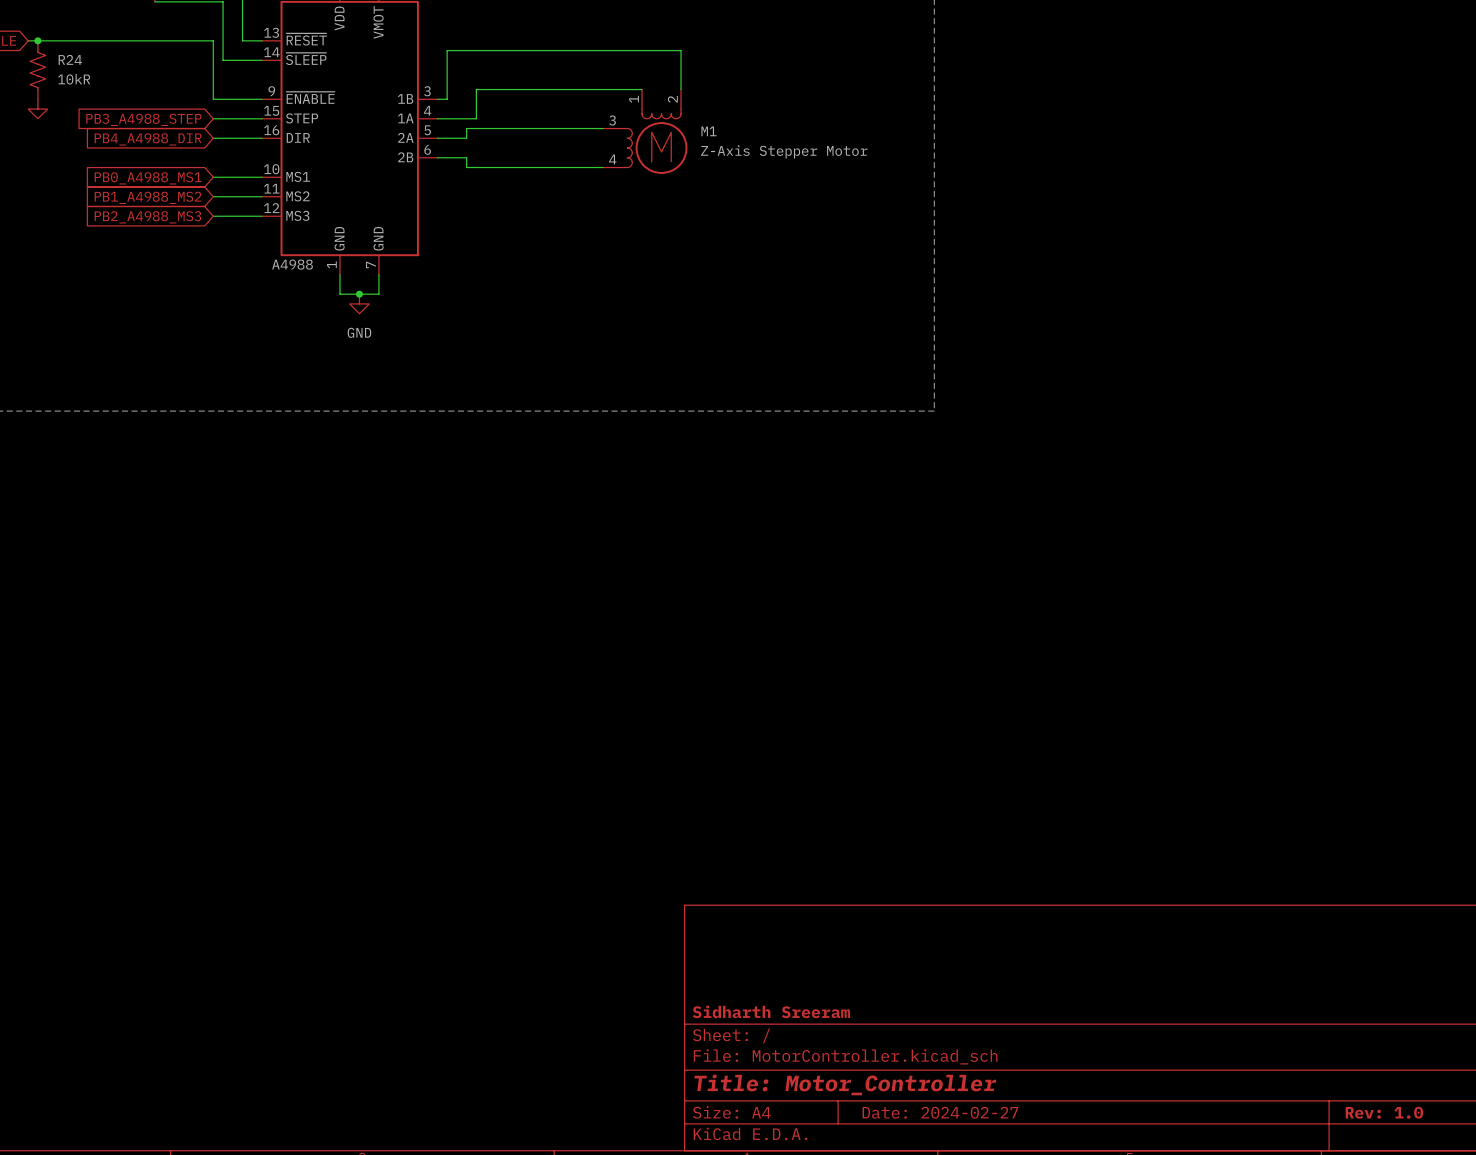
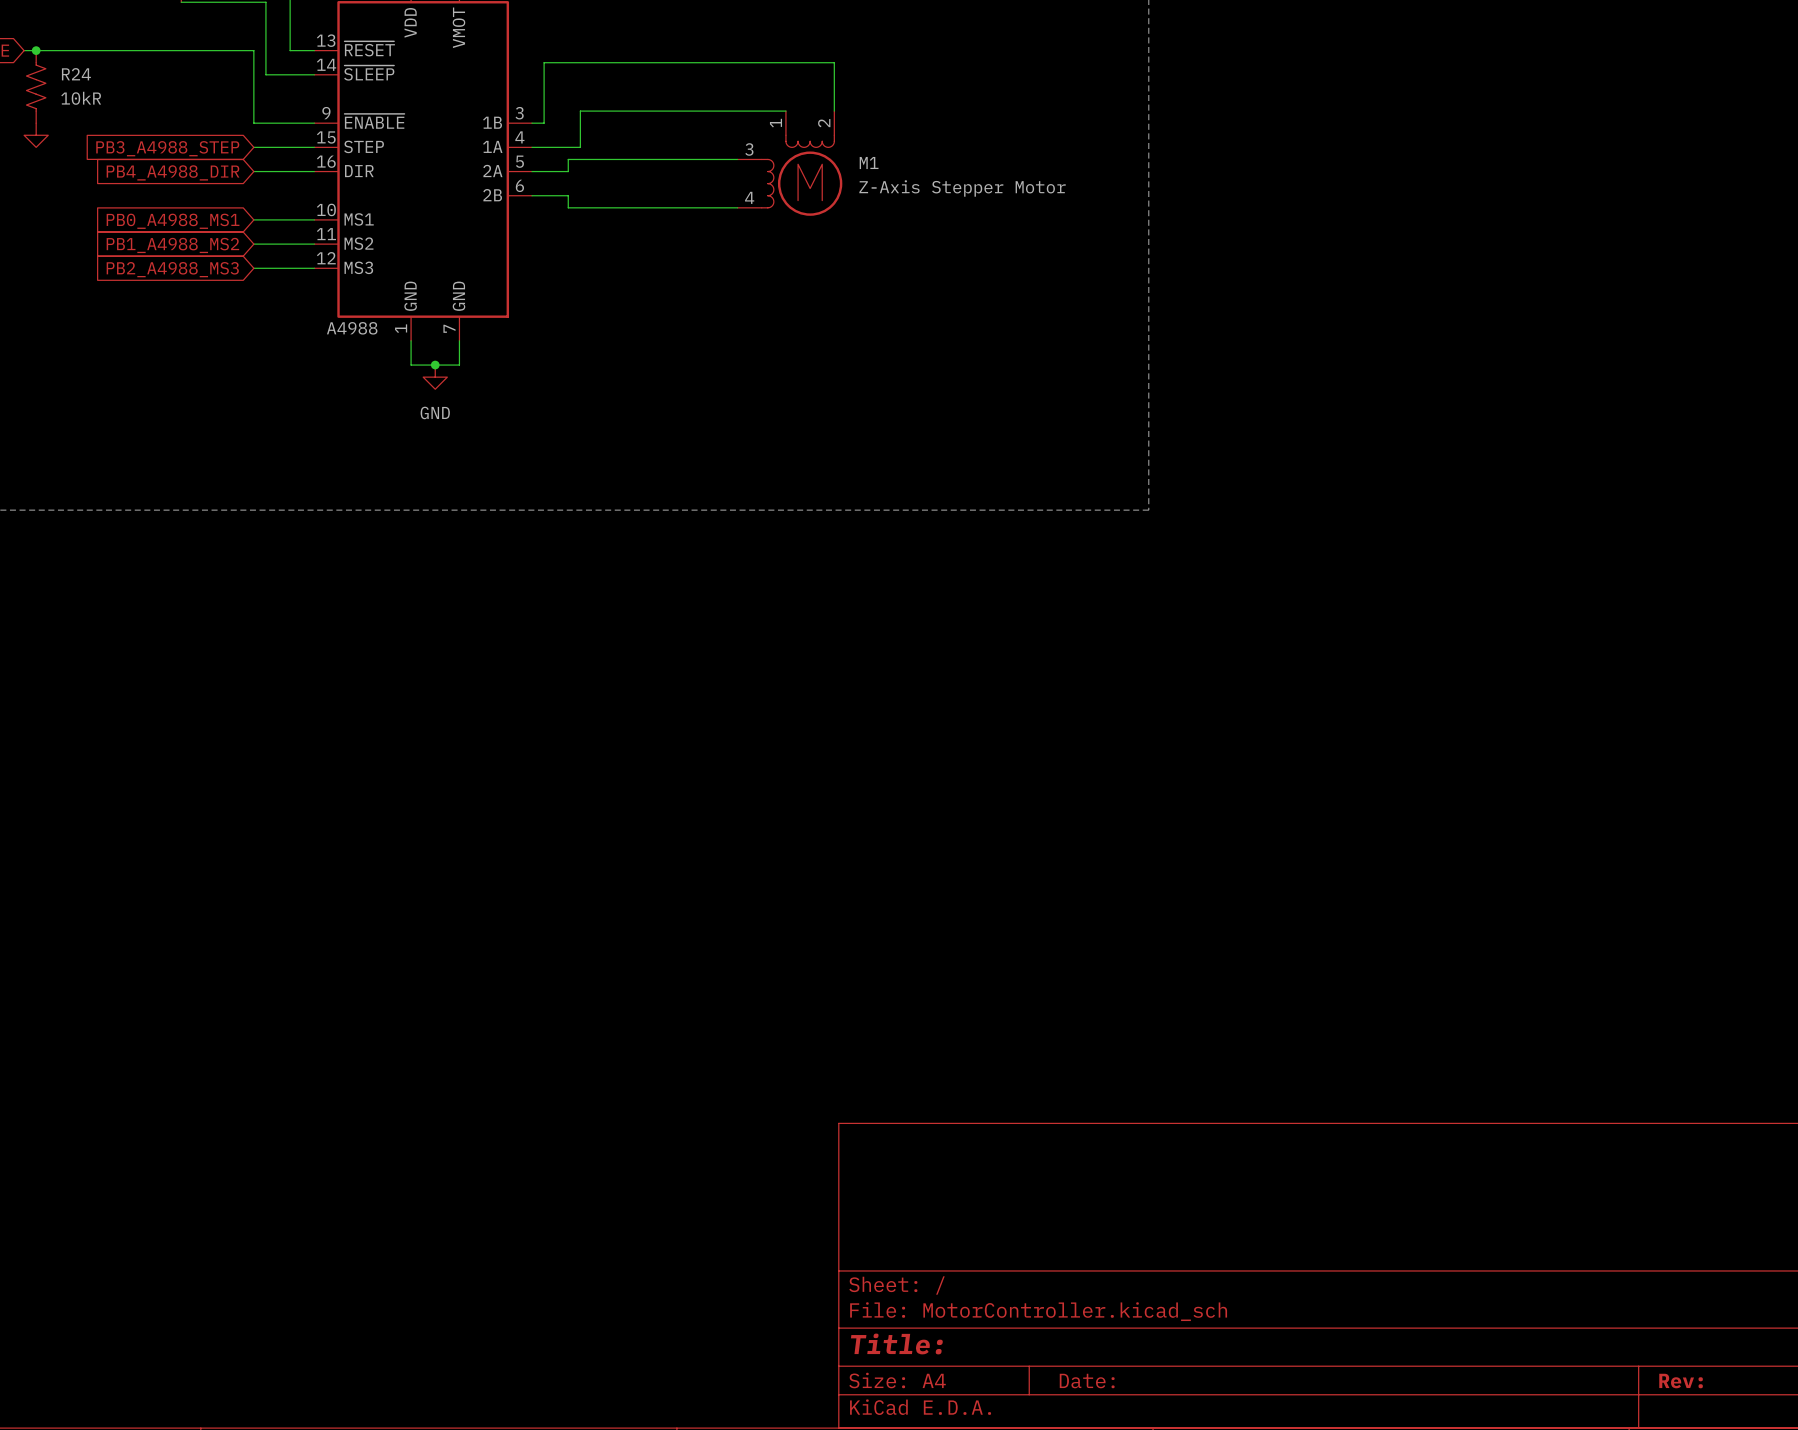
title block: Sidharth Sreeram (771, 1011) -> none
title block: Title: Motor_Controller (845, 1084) -> Title: (896, 1343)
title block: Date: 2024-02-27 (940, 1112) -> Date: (1087, 1381)
title block: Rev: 1.0 (1384, 1112) -> Rev: (1681, 1381)

